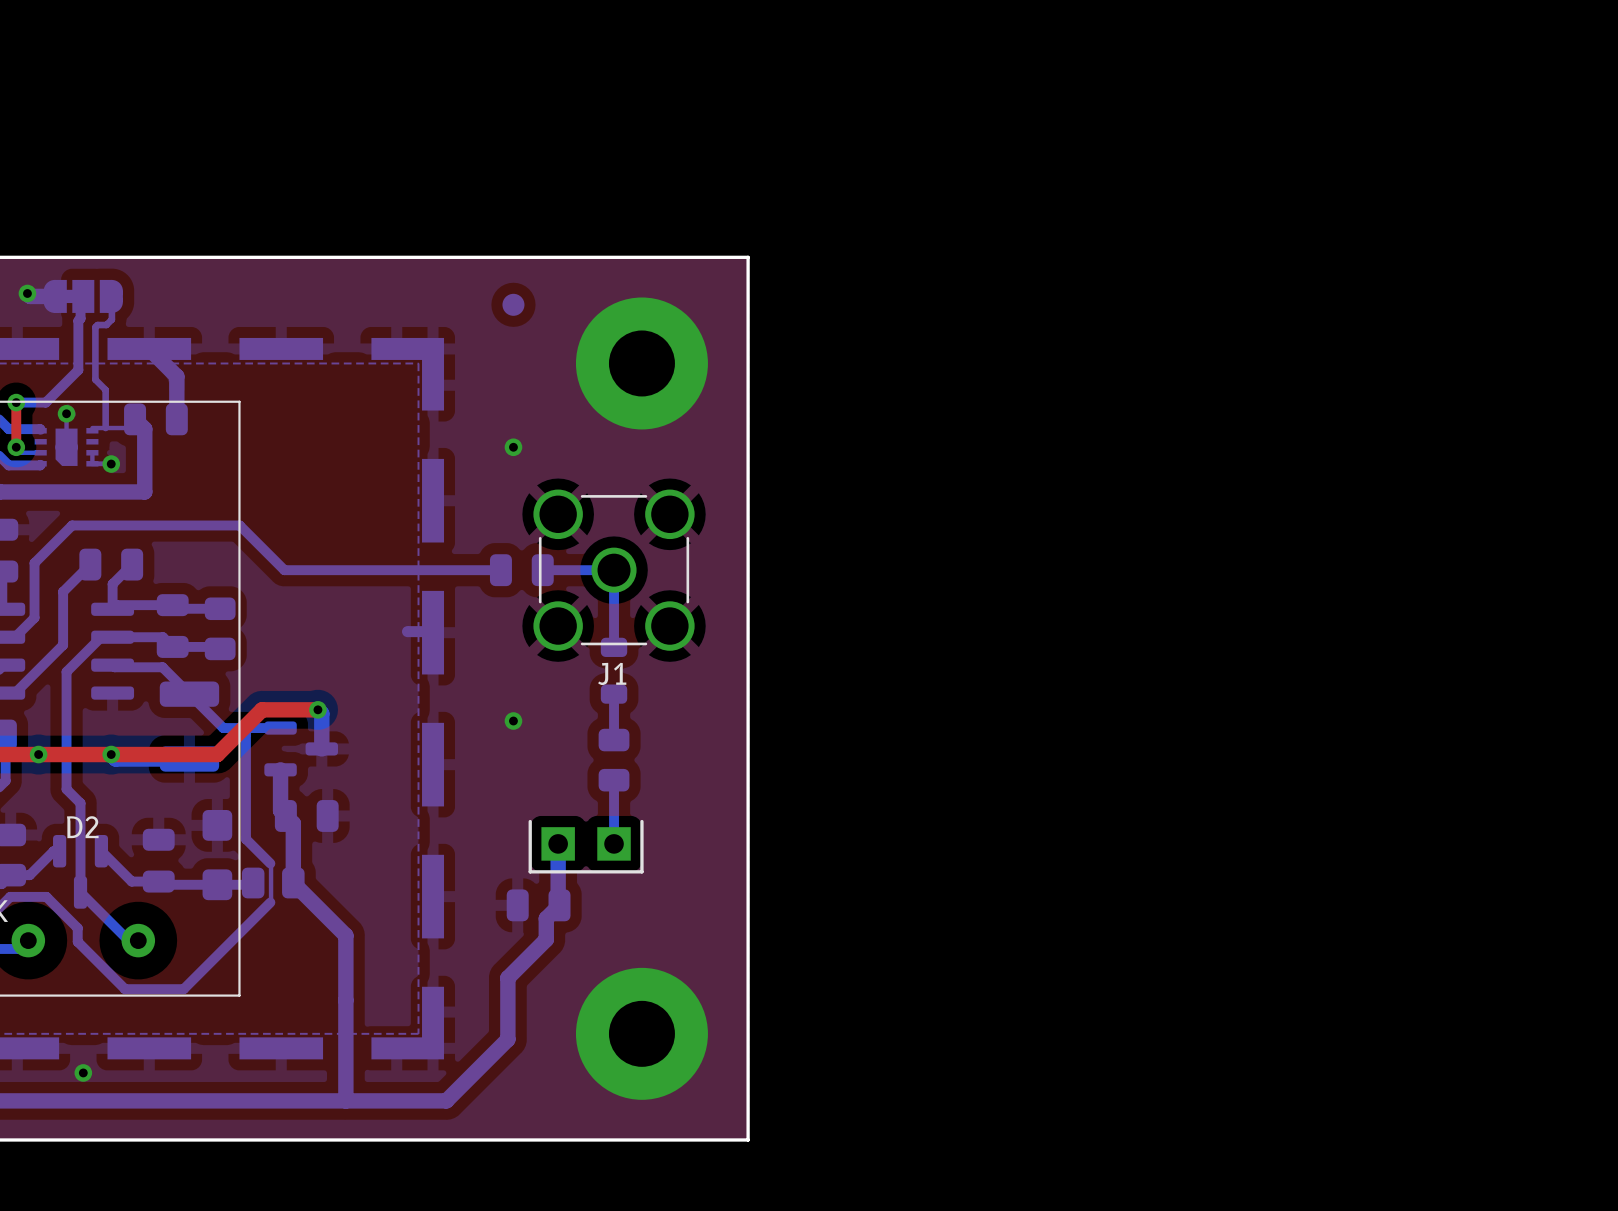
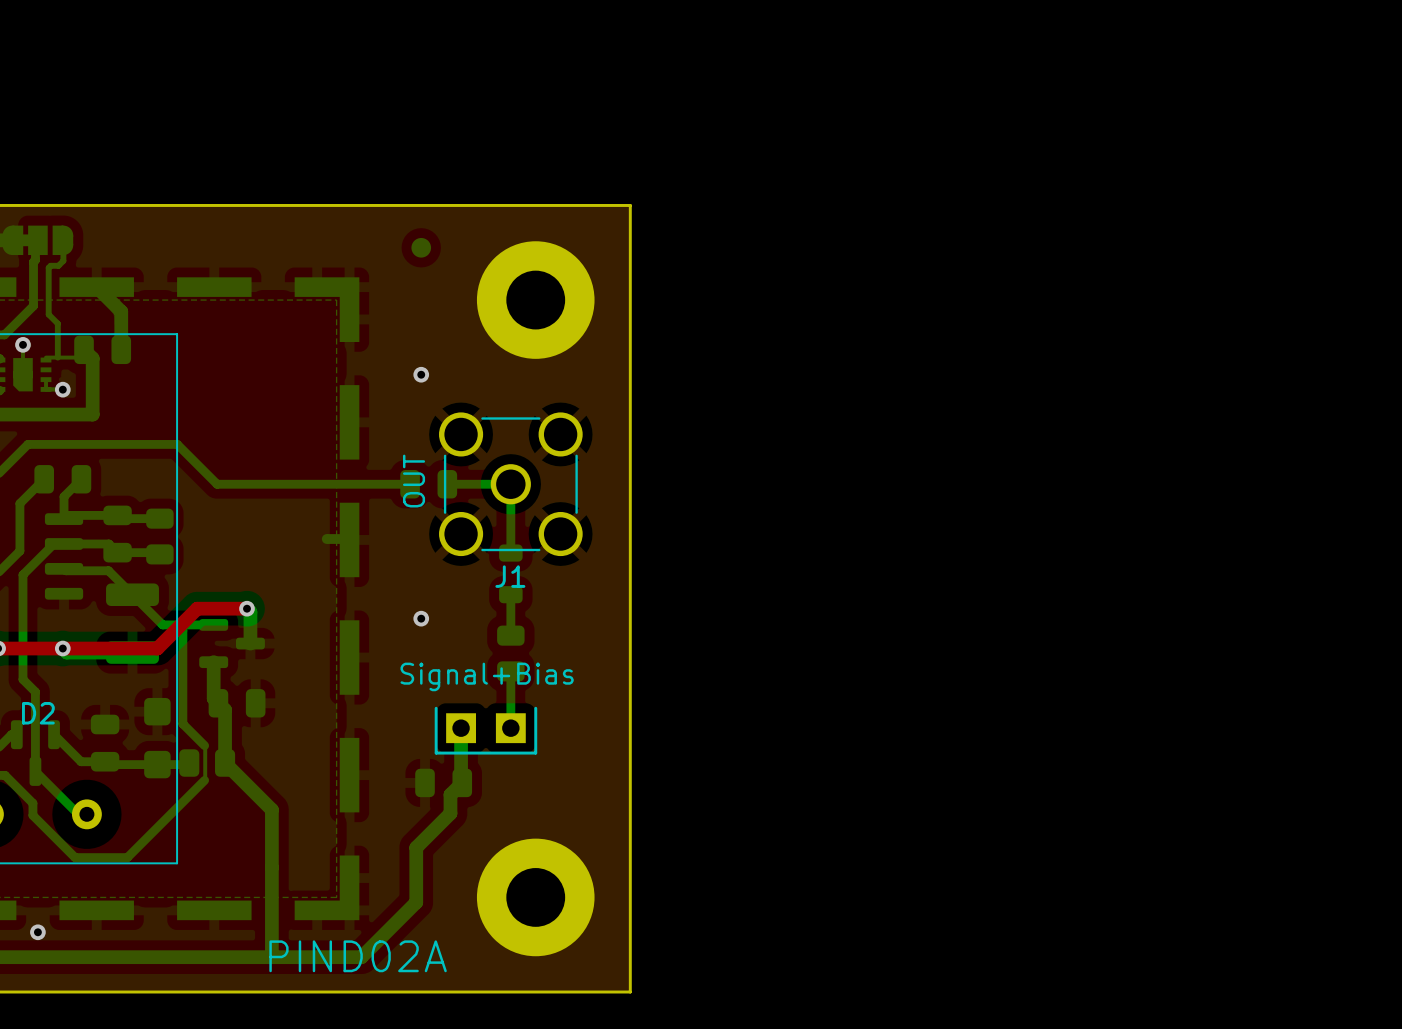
text: none -> OUT (414, 481)
text: none -> Signal+Bias (487, 676)
text: none -> PIND02A (358, 956)

